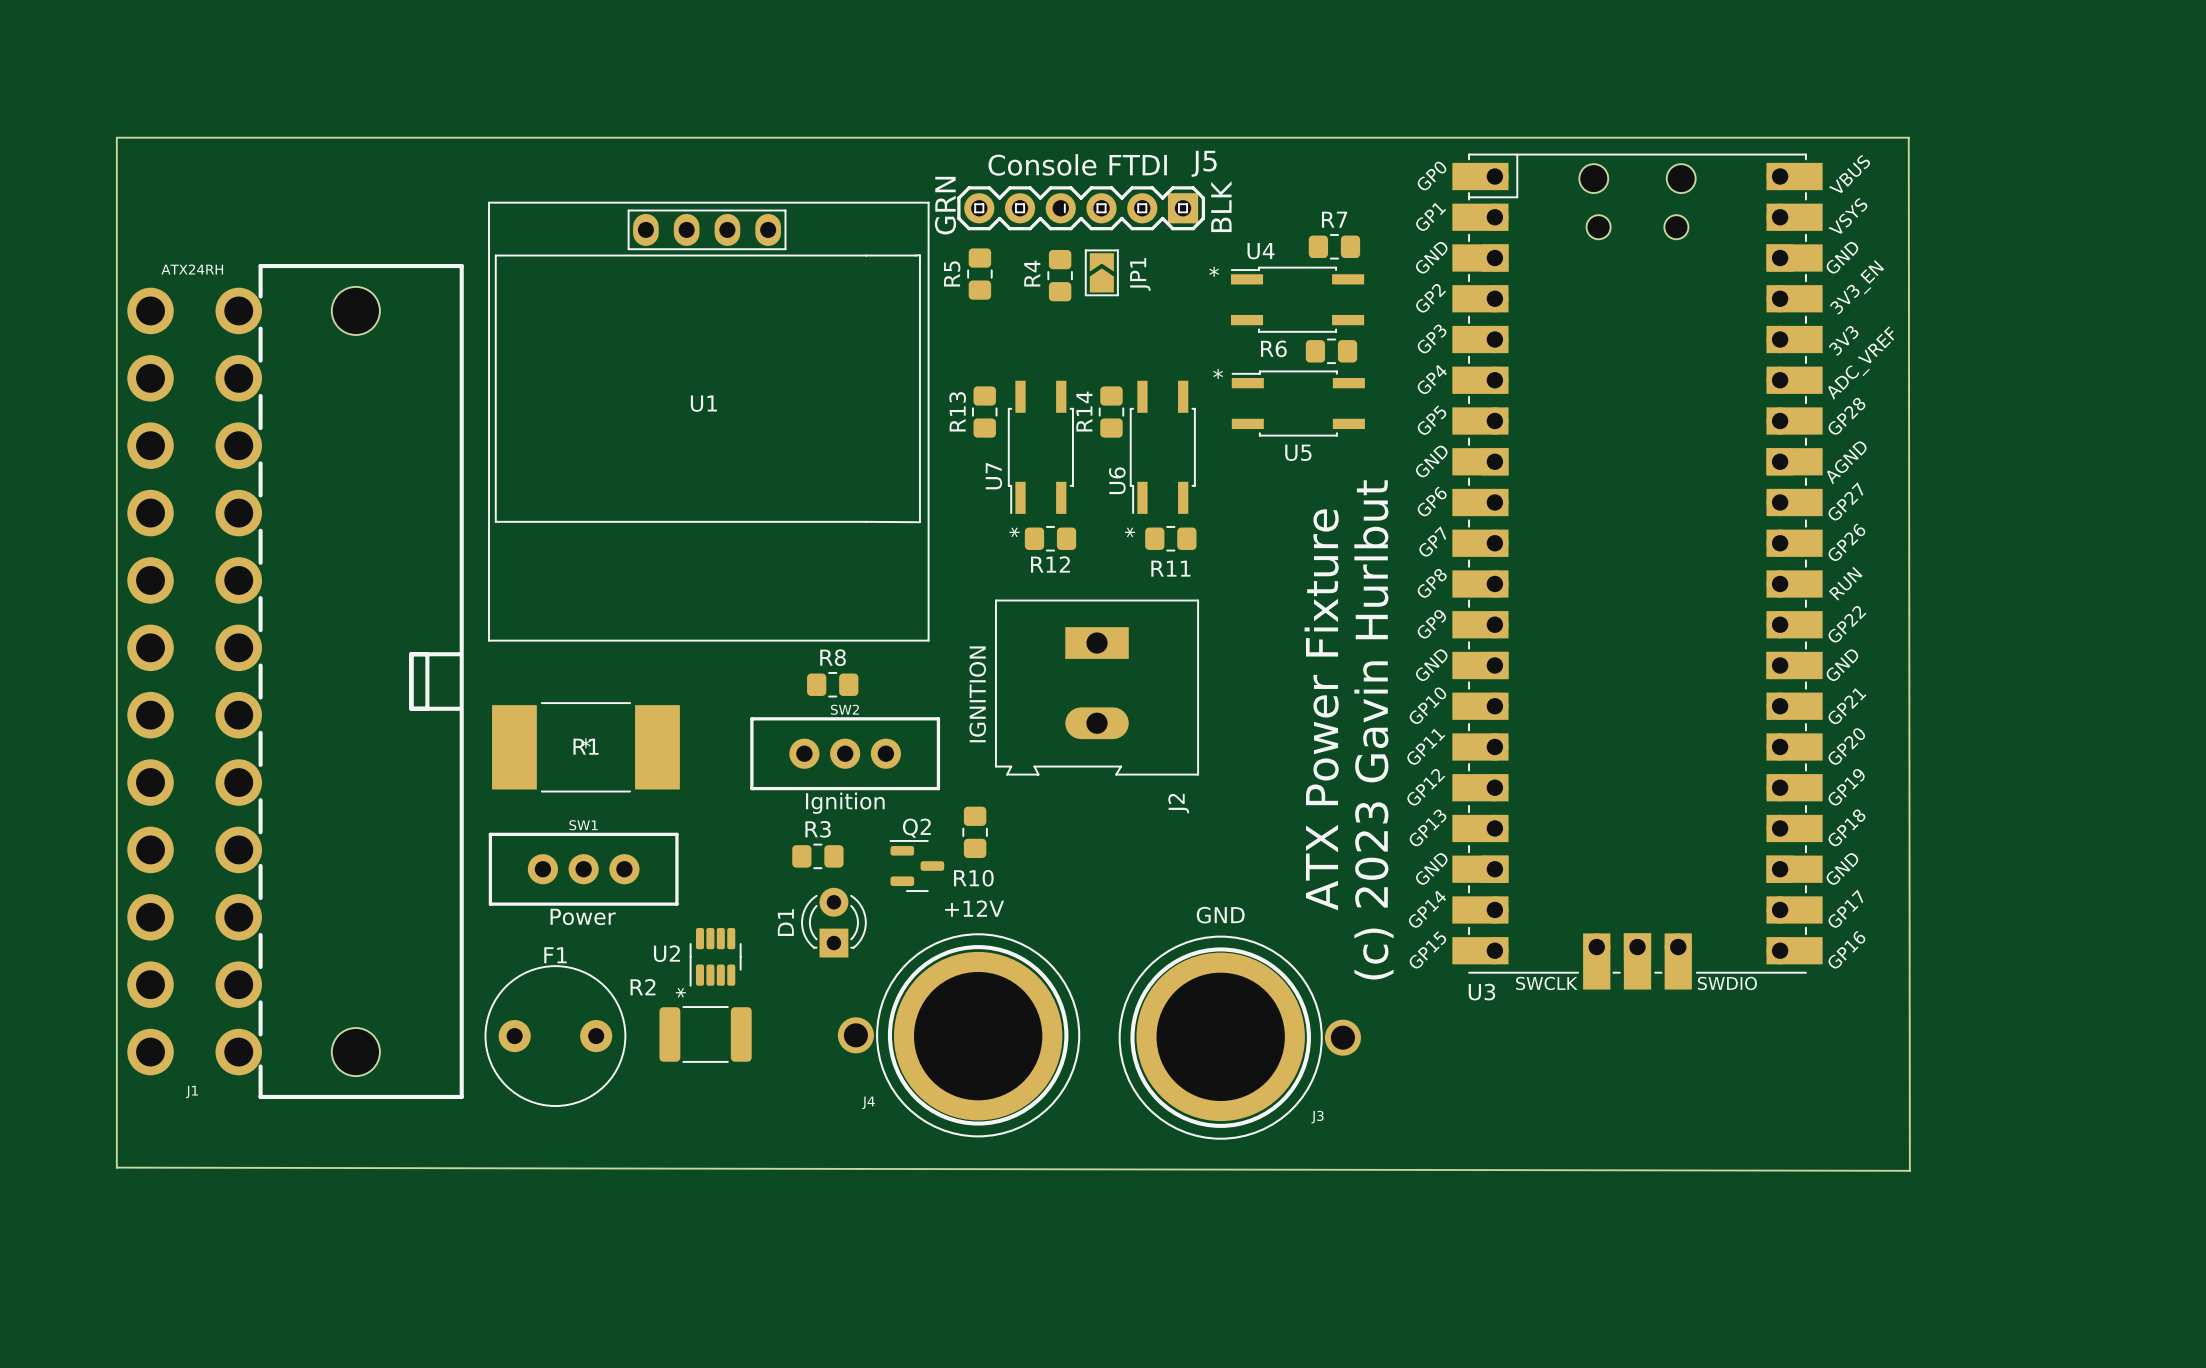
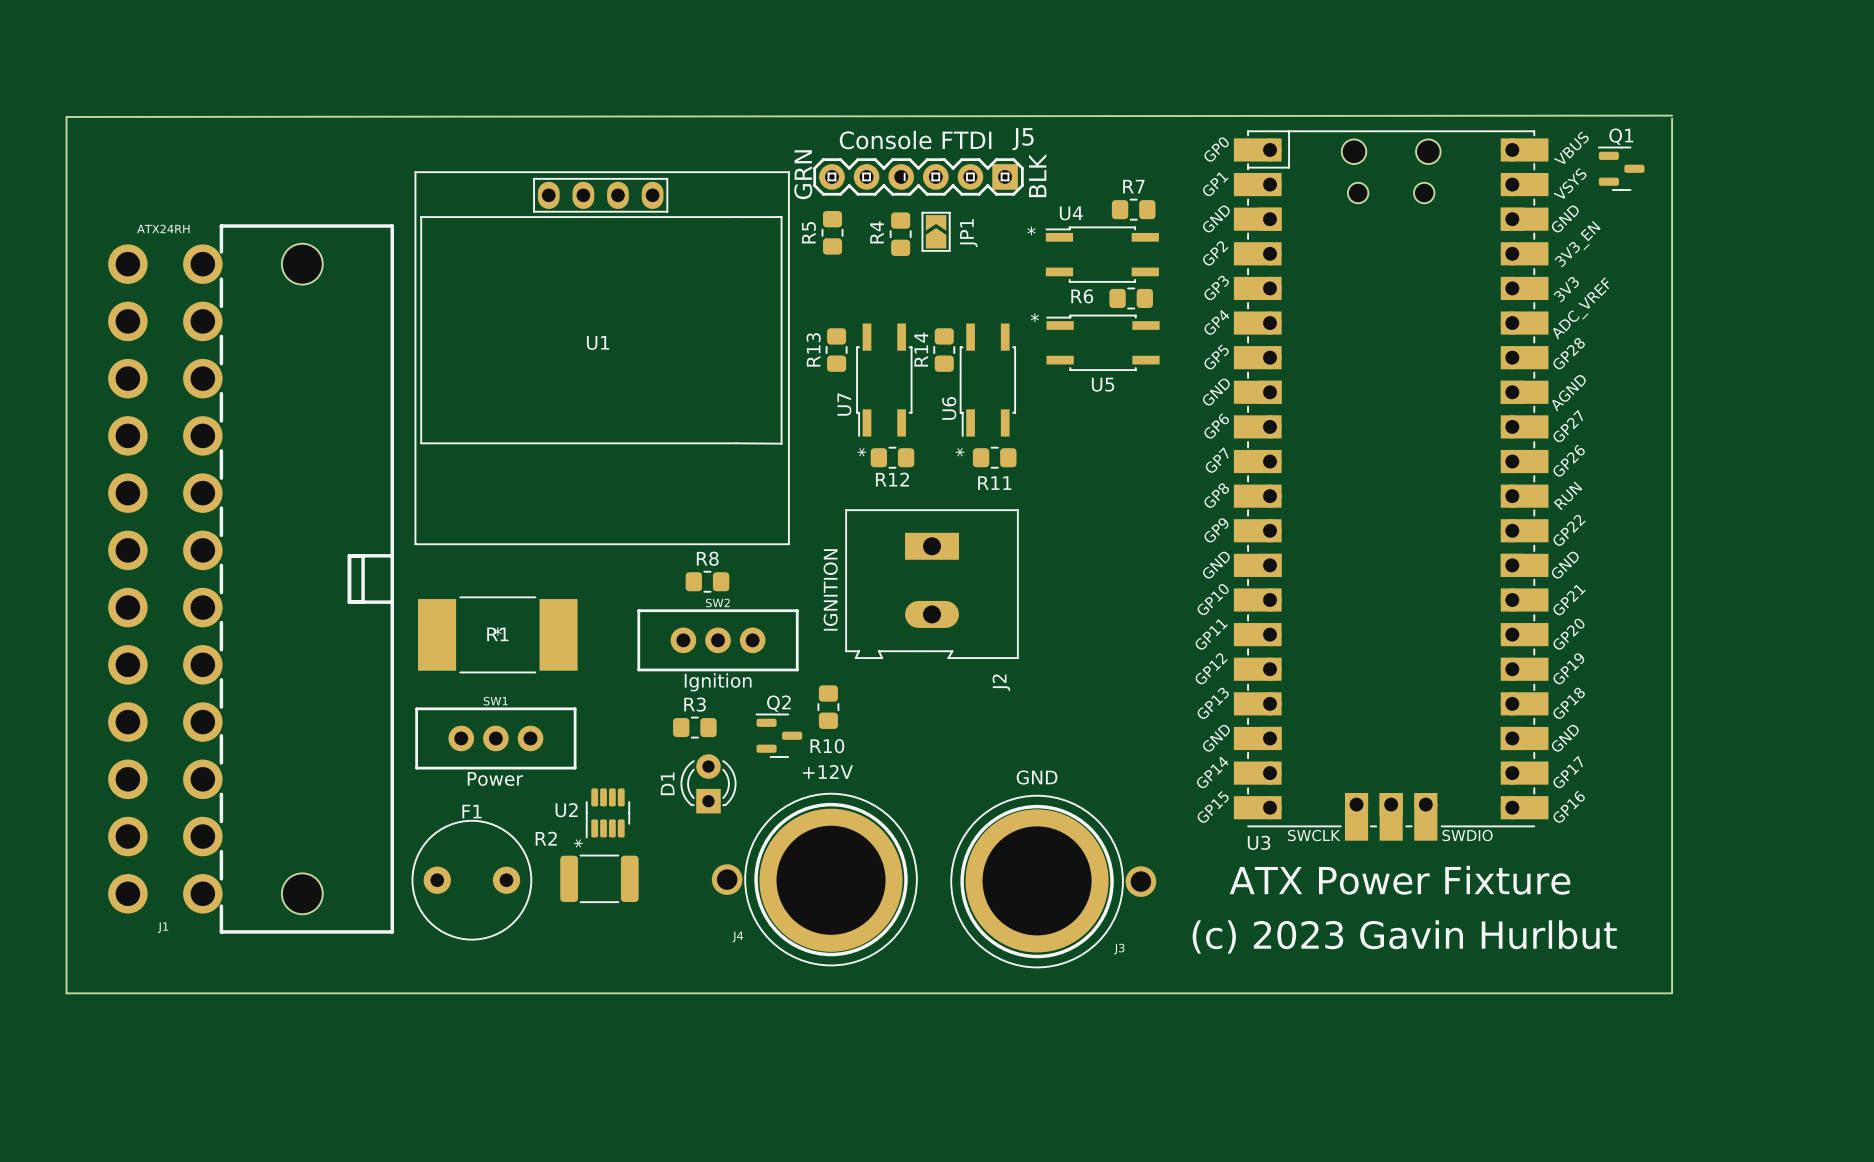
board edge: none -> (1672, 115) (66, 116) (66, 993) (1672, 993) (1672, 118)
board edge: (116, 137) (116, 1167) (1909, 1170) (1908, 137) (116, 137) -> none
Q1: none -> (1621, 168)
text: ATX Power Fixture (1321, 709) -> none
text: (c) 2023 Gavin Hurlbut (1373, 729) -> none
text: none -> ATX Power Fixture (1400, 880)
text: none -> (c) 2023 Gavin Hurlbut (1404, 936)

